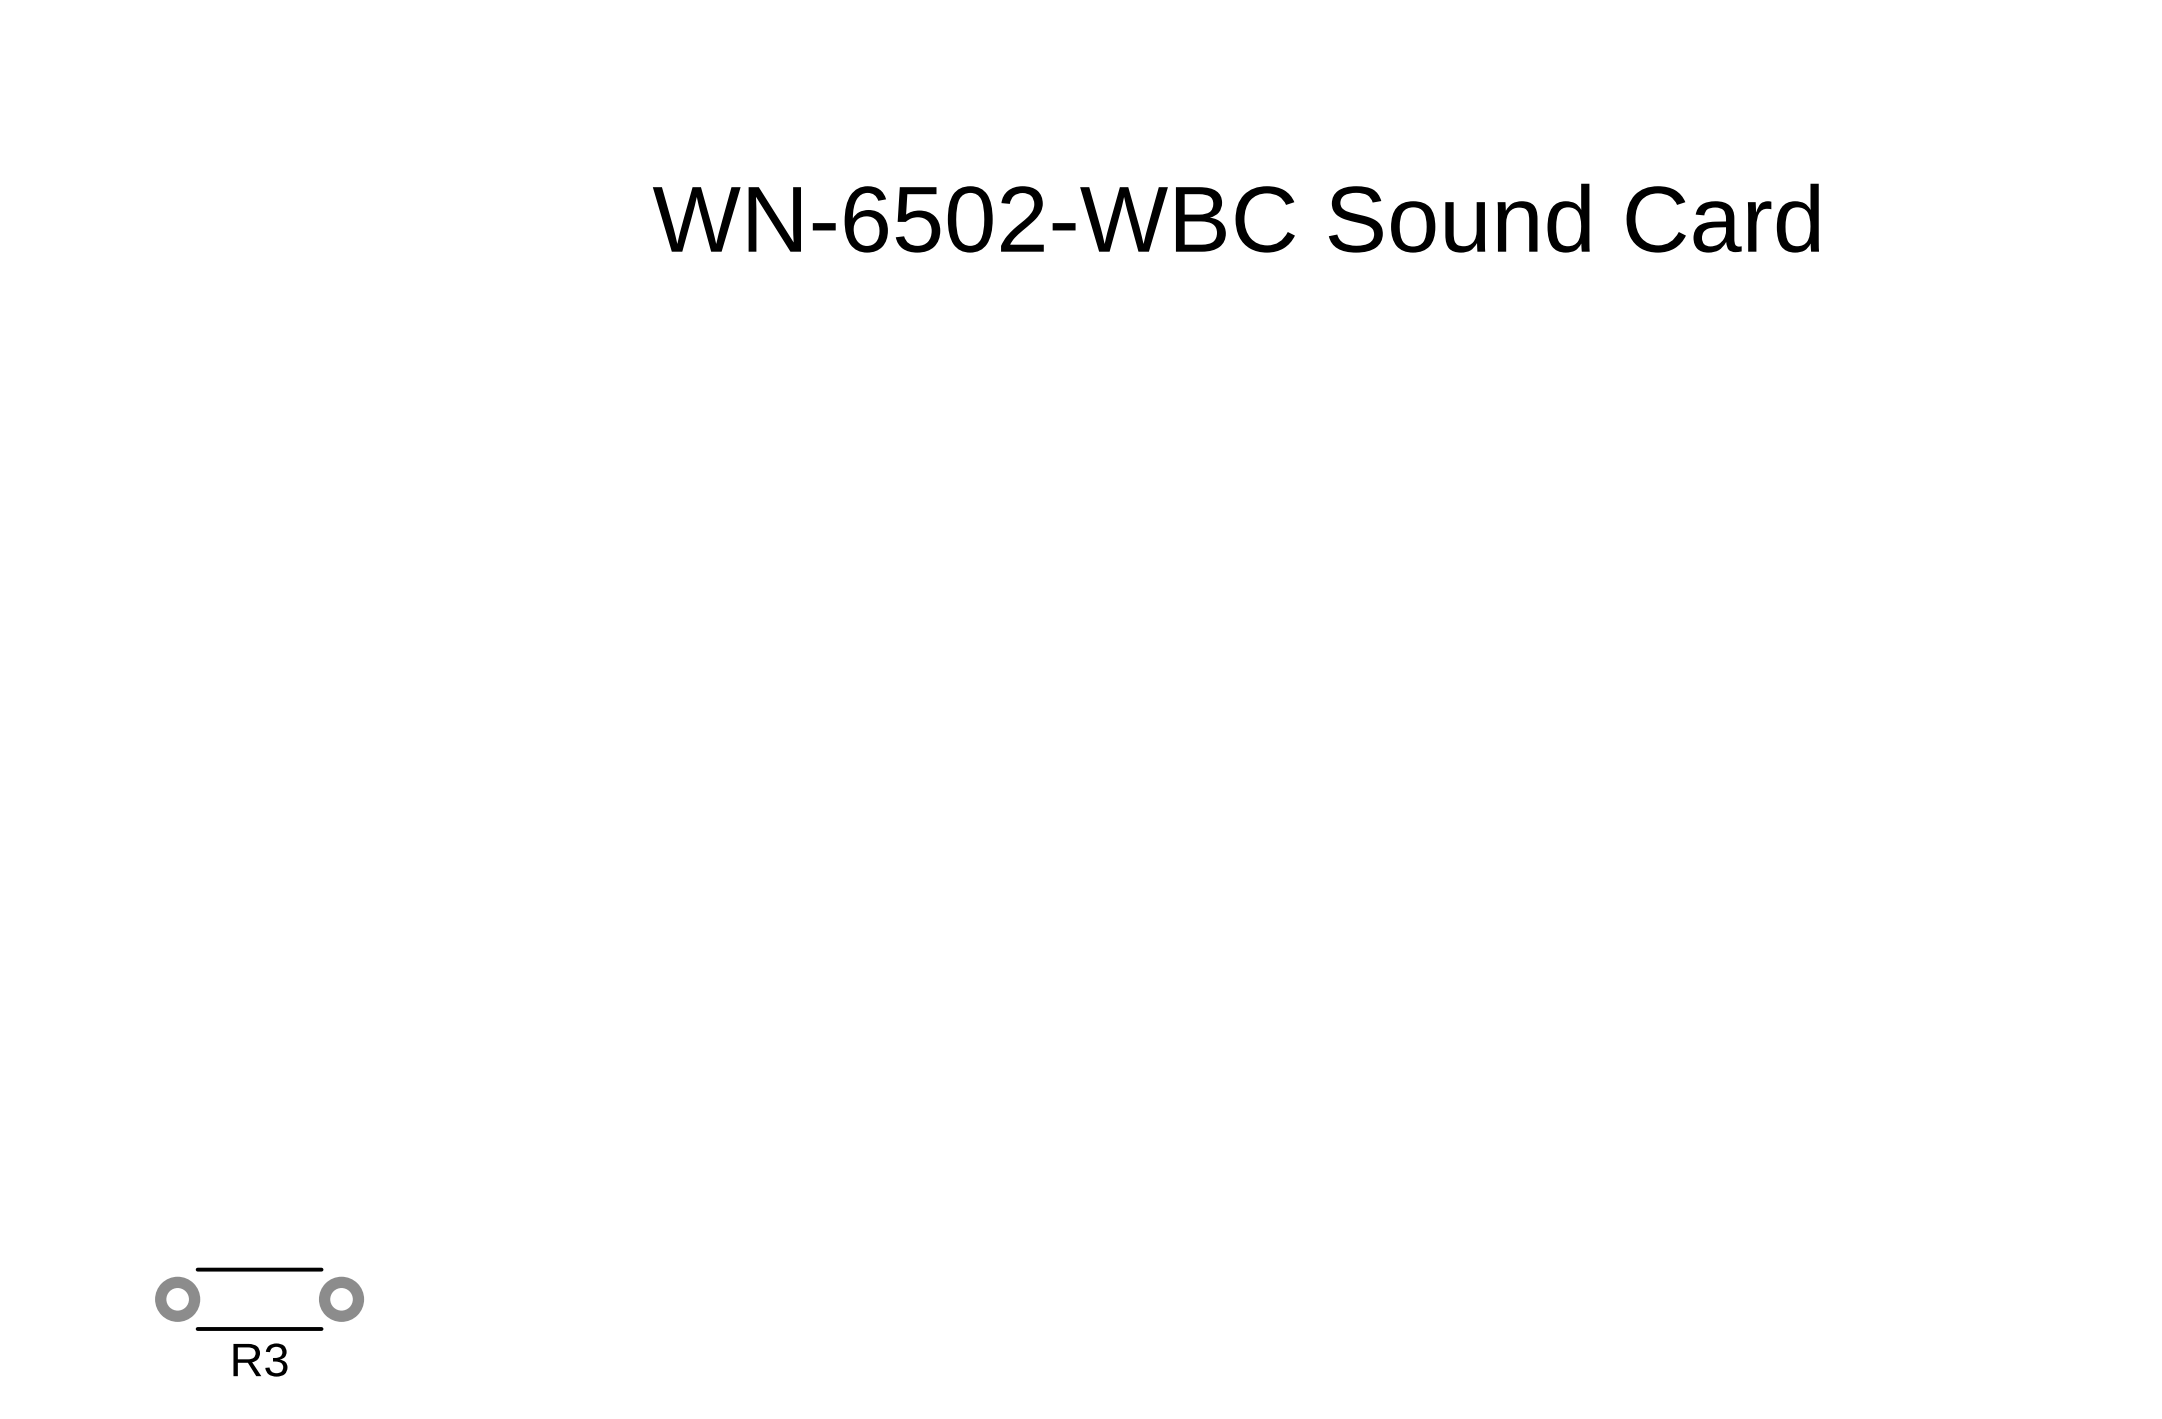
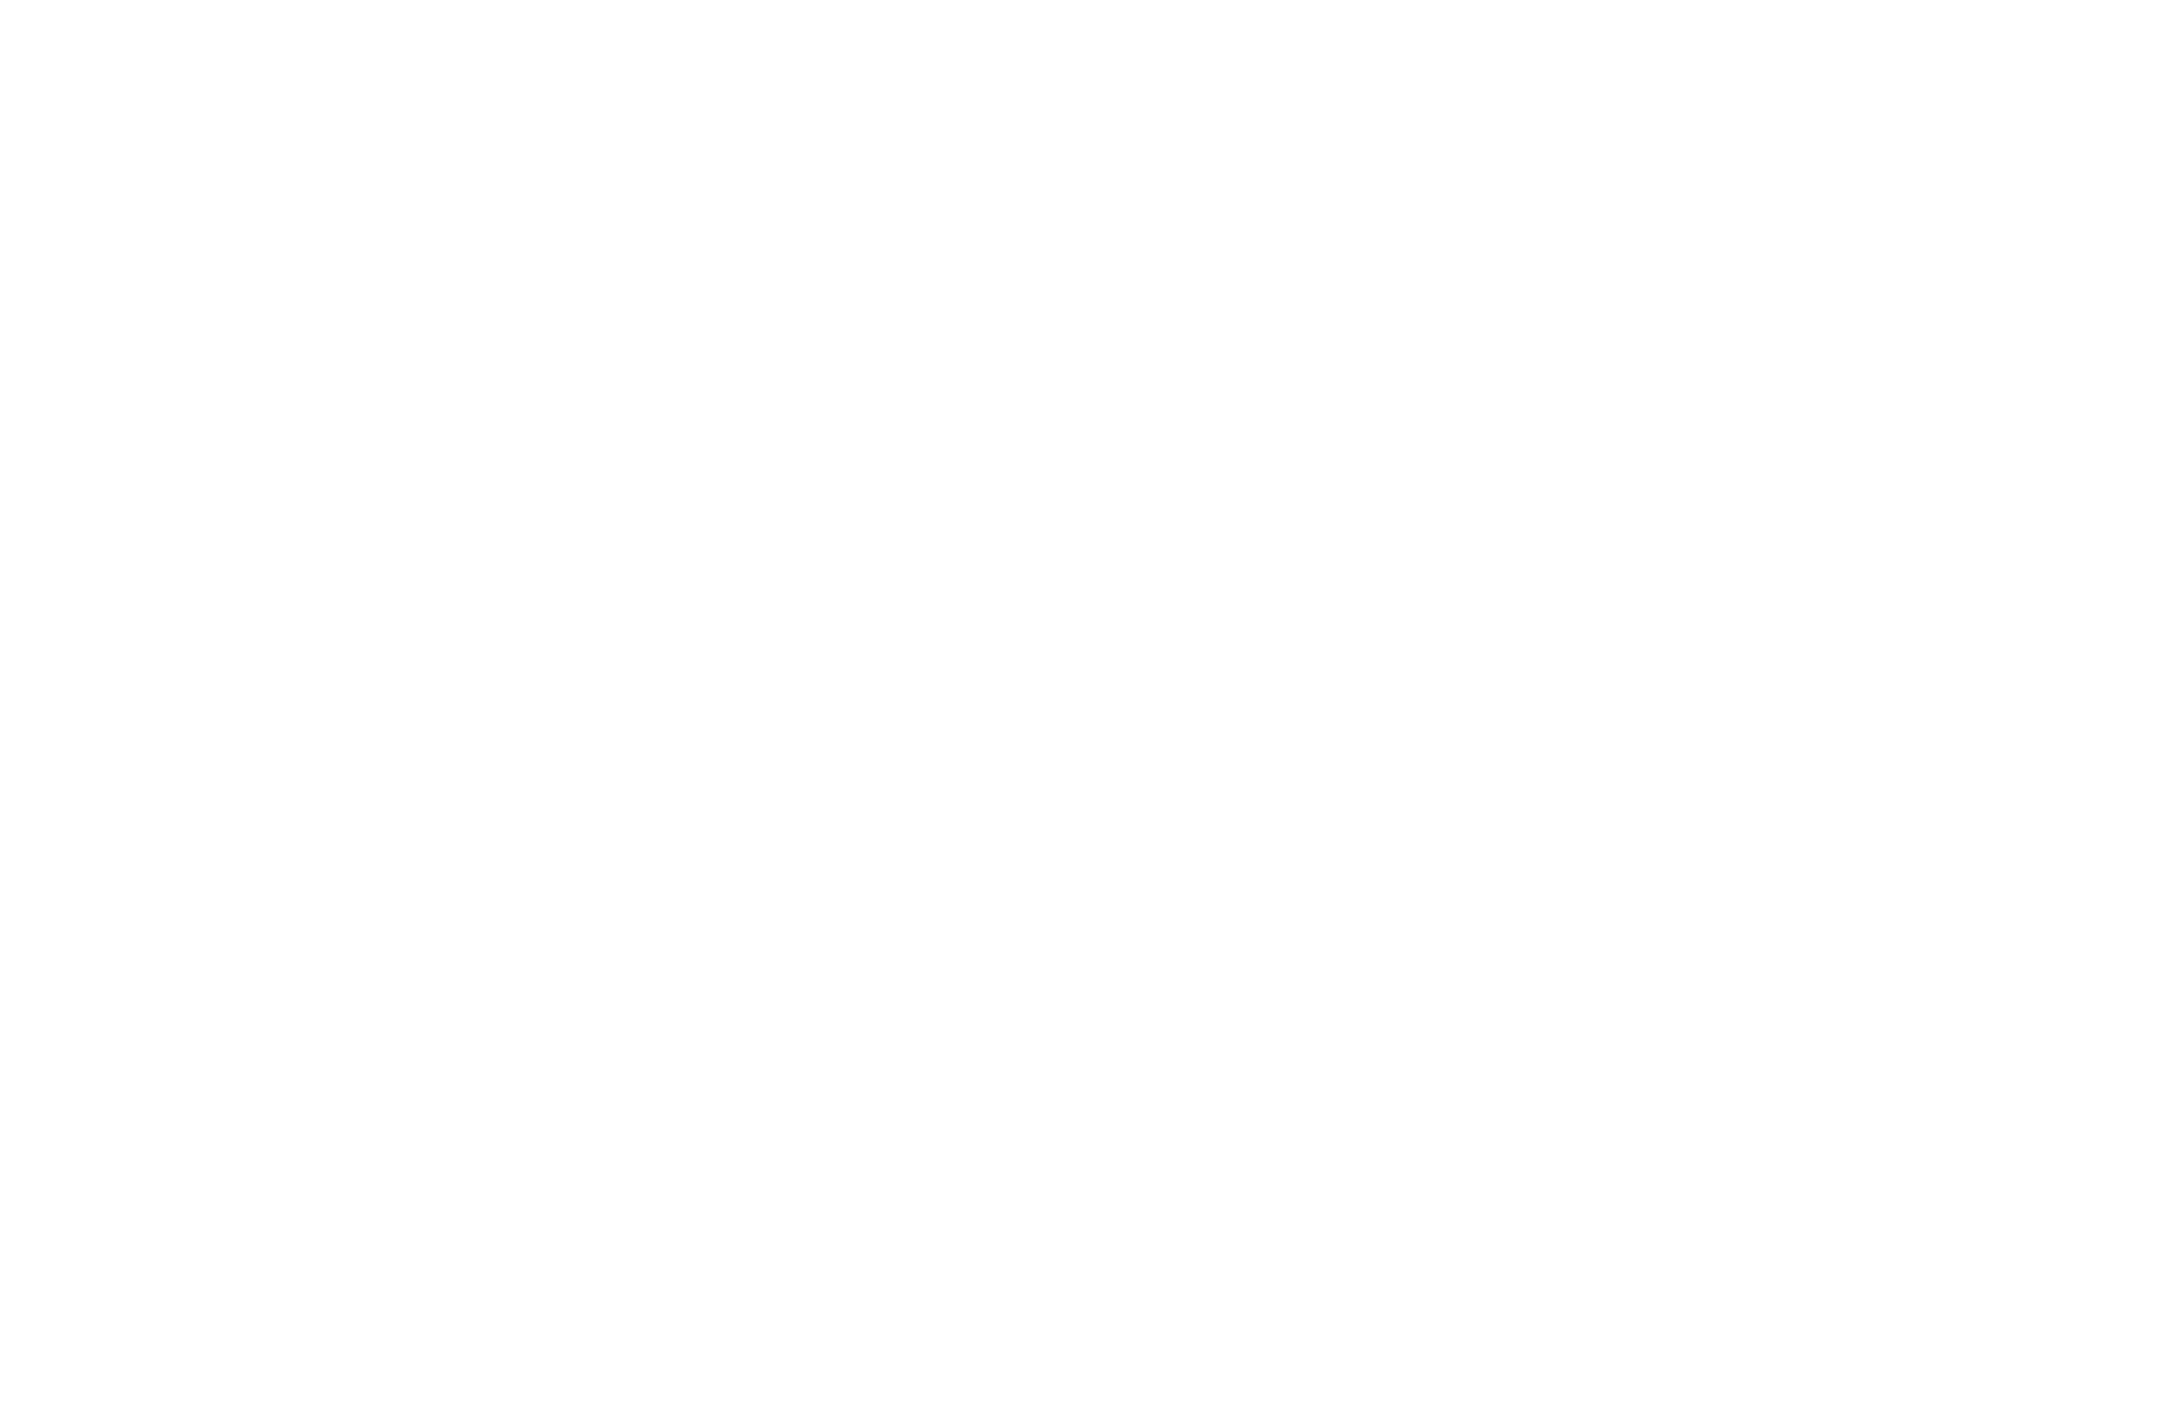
text: WN-6502-WBC Sound Card (1235, 218) -> none
R3: (259, 1299) -> none

